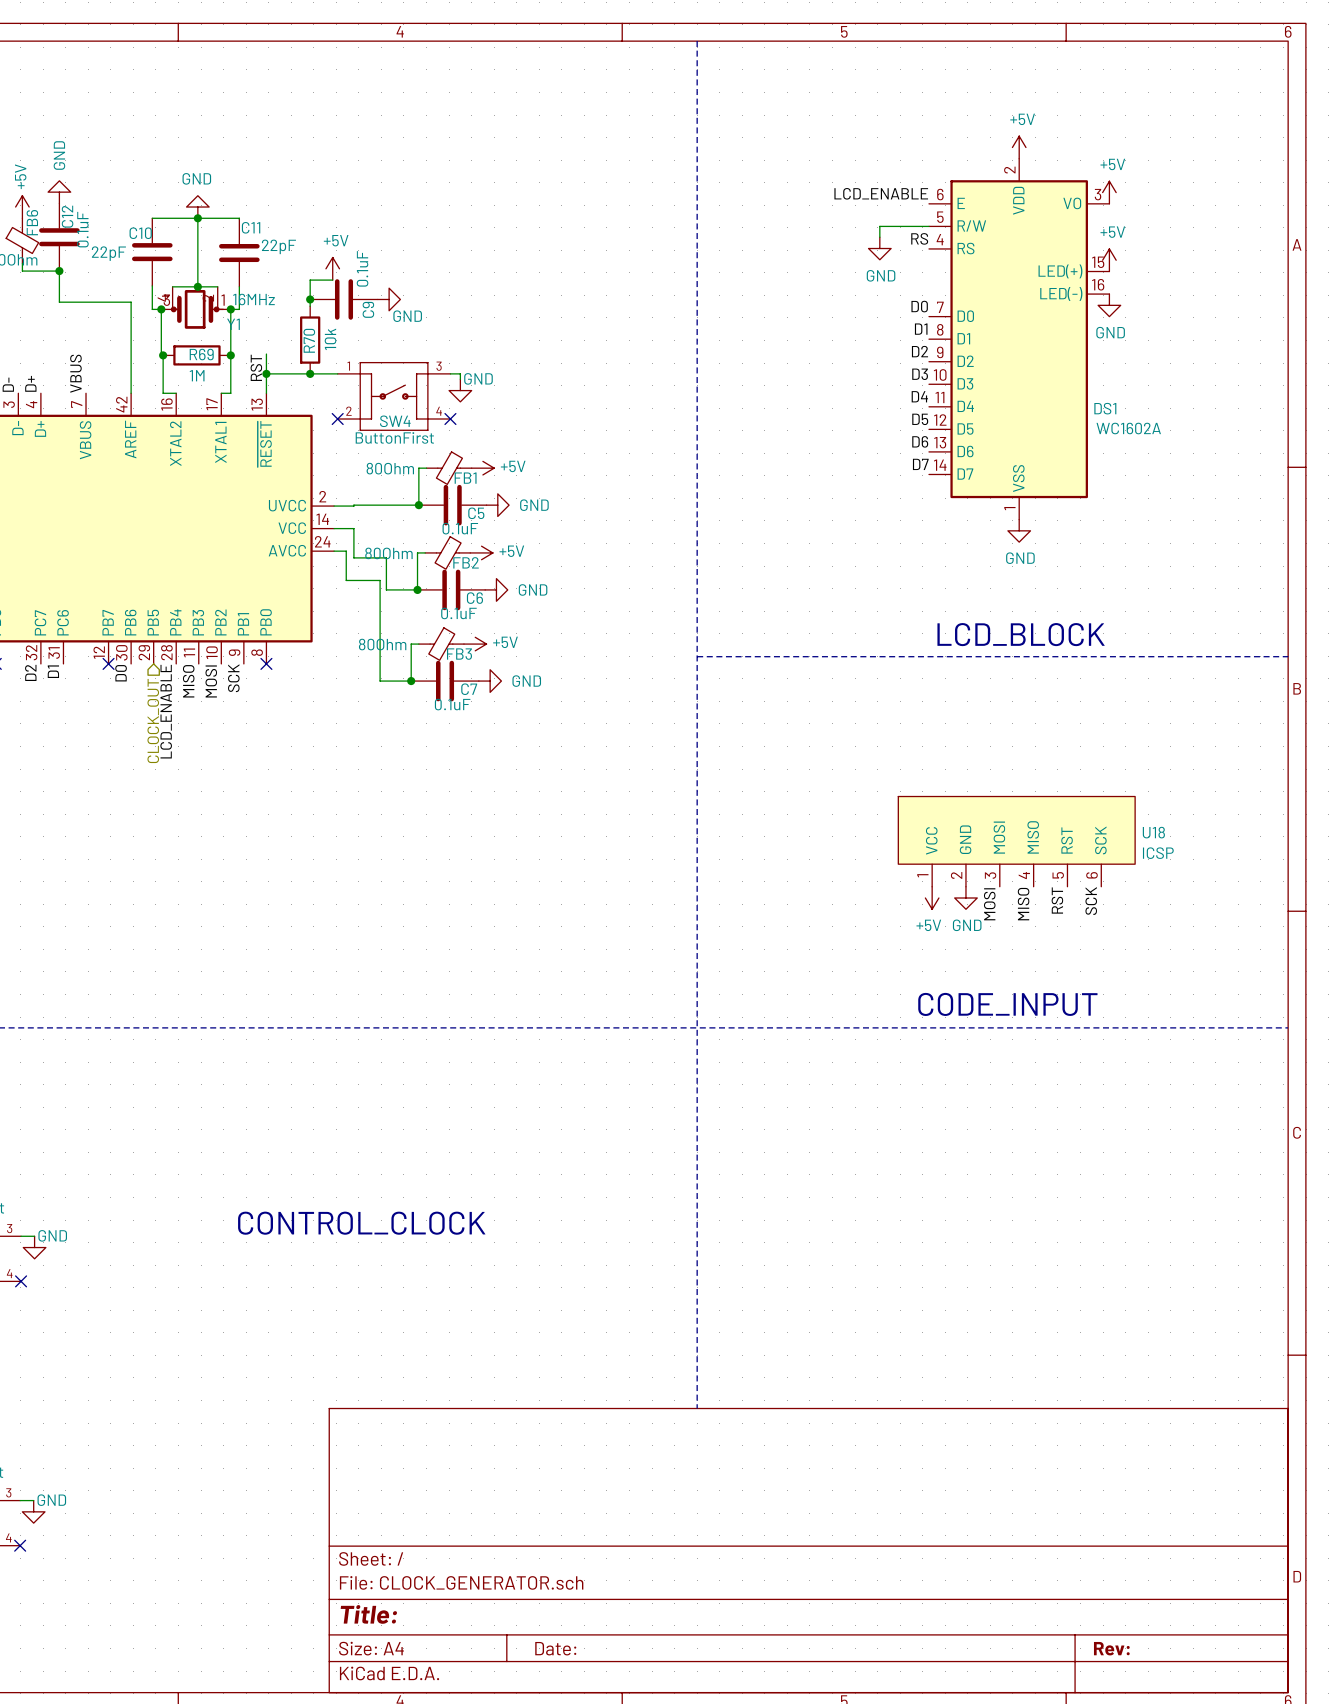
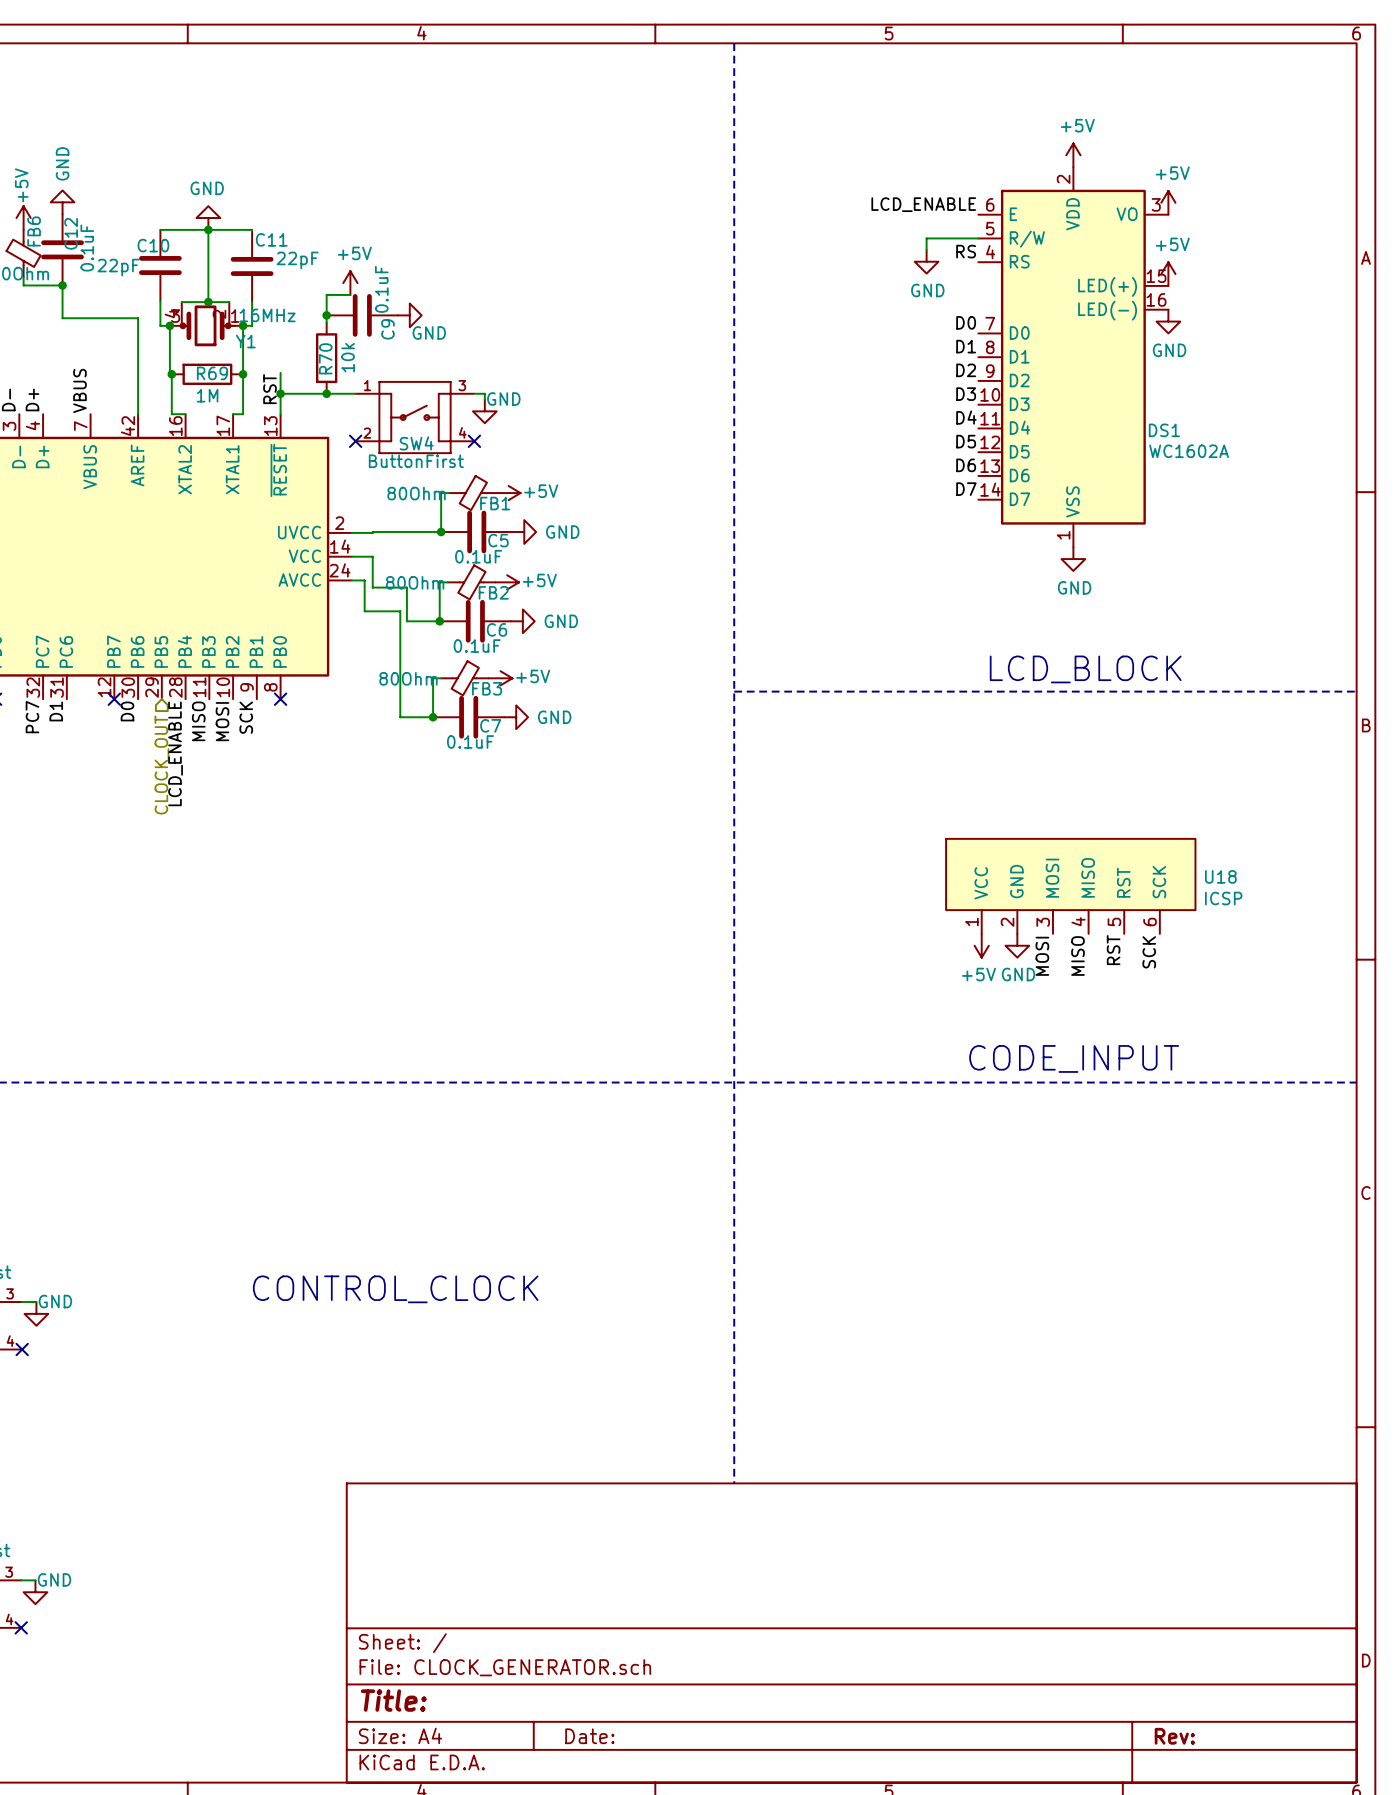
label: D2 (30, 672) -> PC7 (32, 717)

